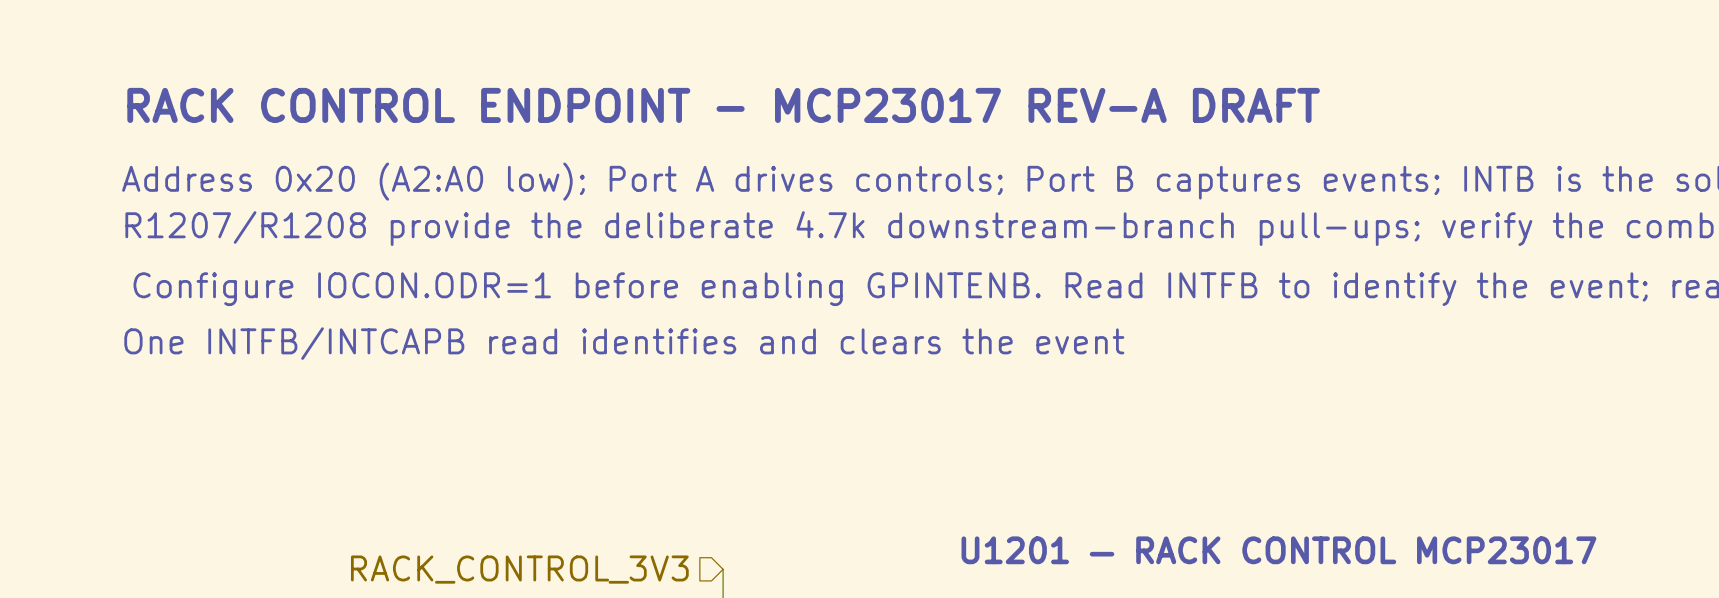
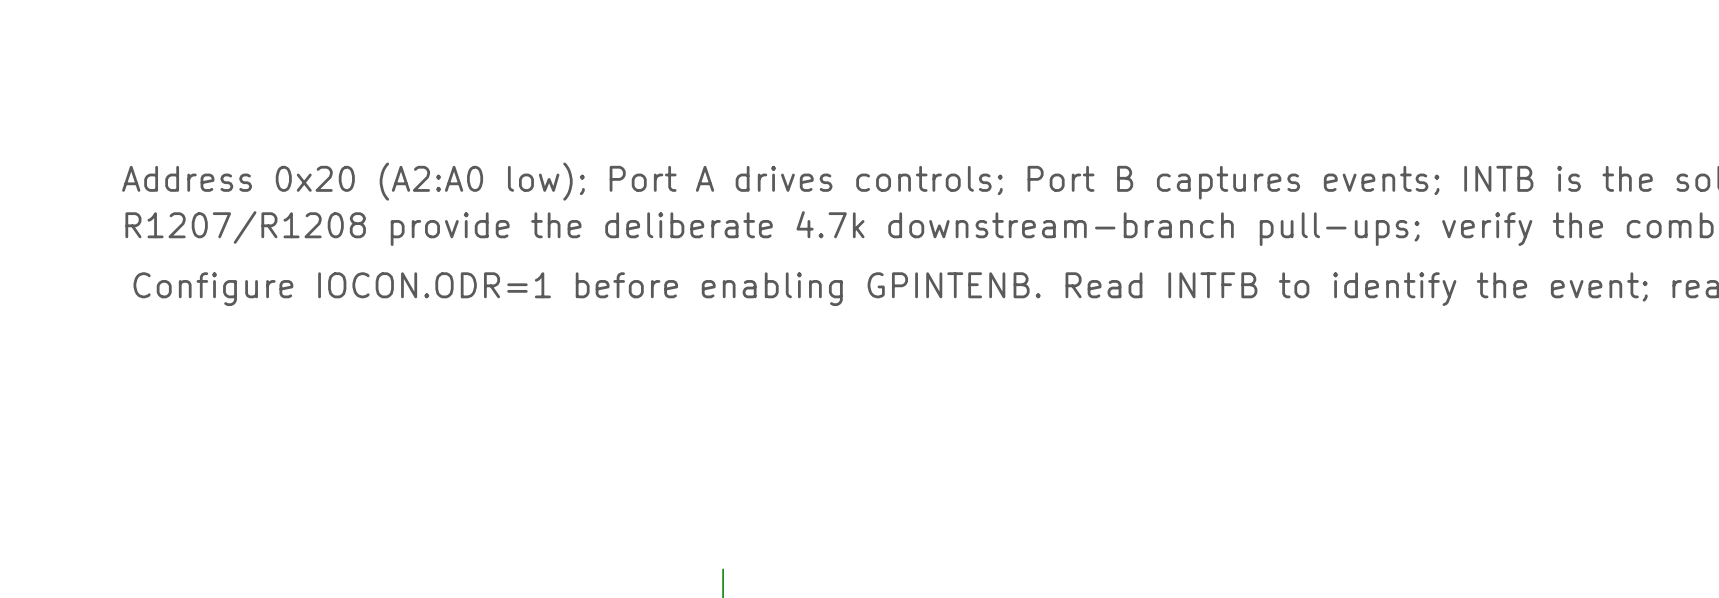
text: RACK CONTROL ENDPOINT - MCP23017 REV-A DRAFT (723, 105) -> none
text: One INTFB/INTCAPB read identifies and clears the event (624, 343) -> none
text: U1201 — RACK CONTROL MCP23017 (1278, 550) -> none
hierarchical label: RACK_CONTROL_3V3 (519, 569) -> none

